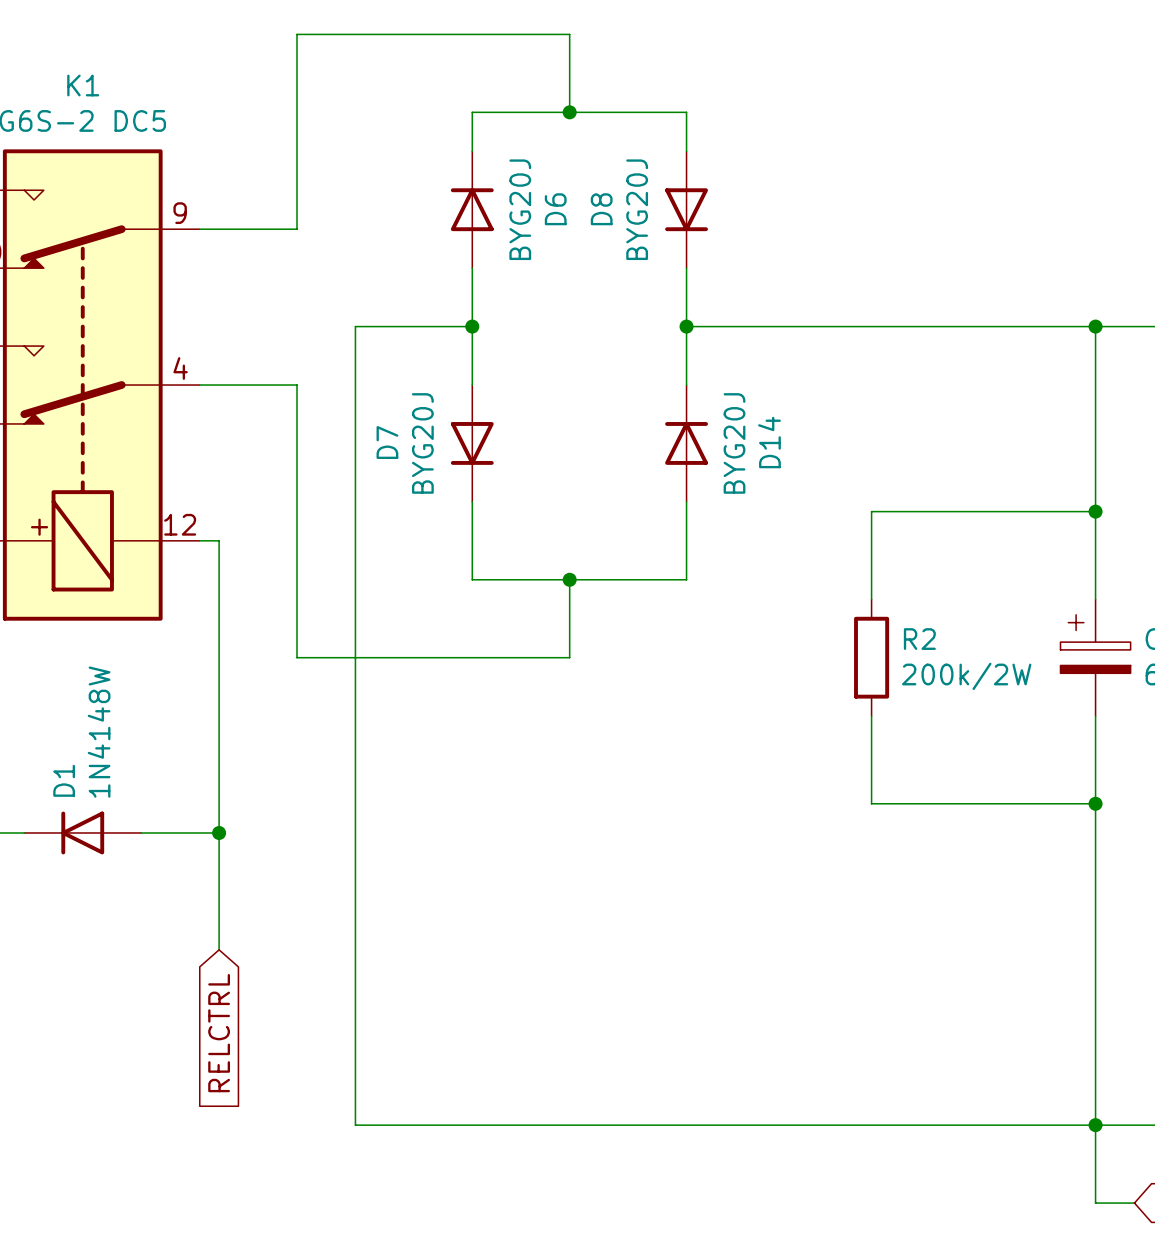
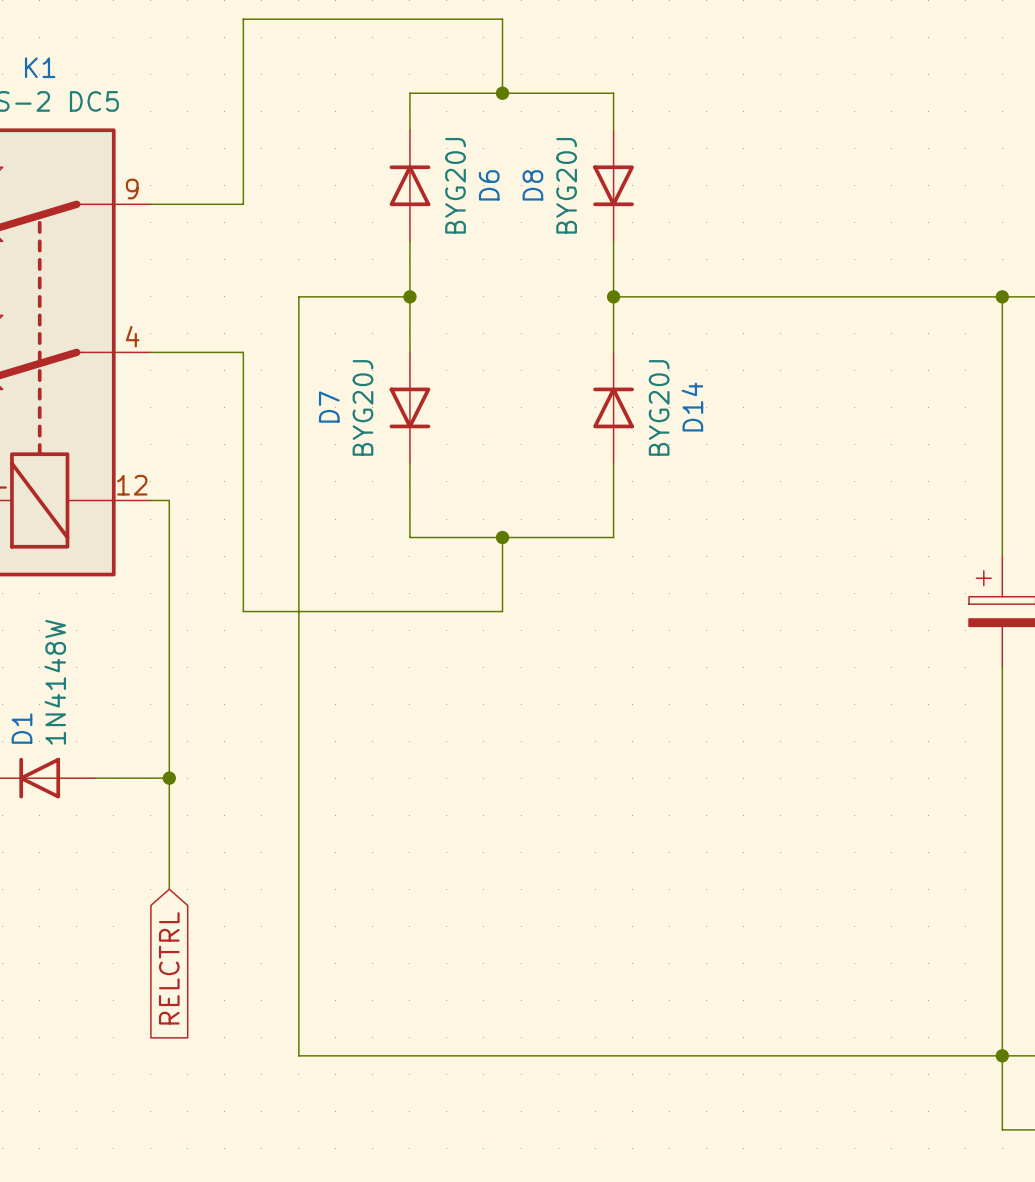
wire: (1095, 511) (871, 511) (871, 599) -> none
junction: (1095, 511) -> none
R2: 200k/2W (871, 657) -> none
wire: (871, 716) (871, 803) (1095, 803) -> none
junction: (1095, 803) -> none

